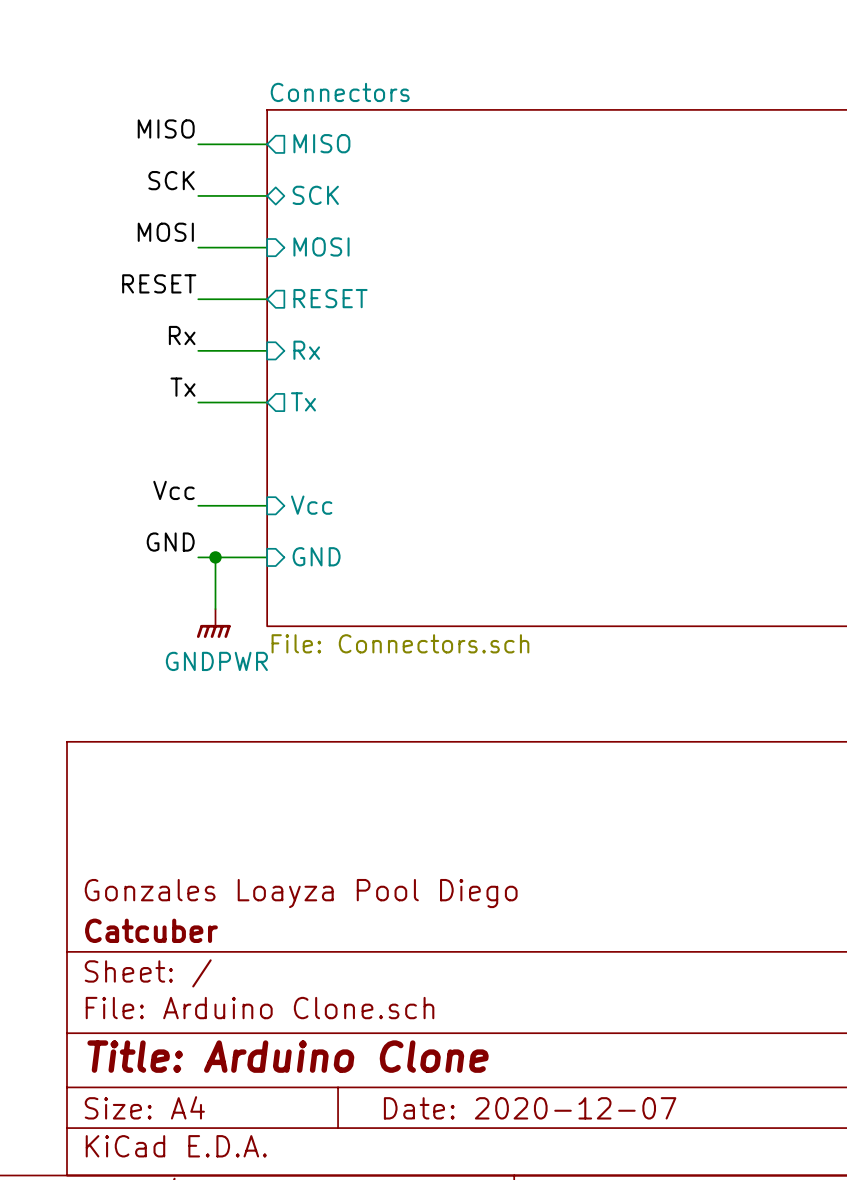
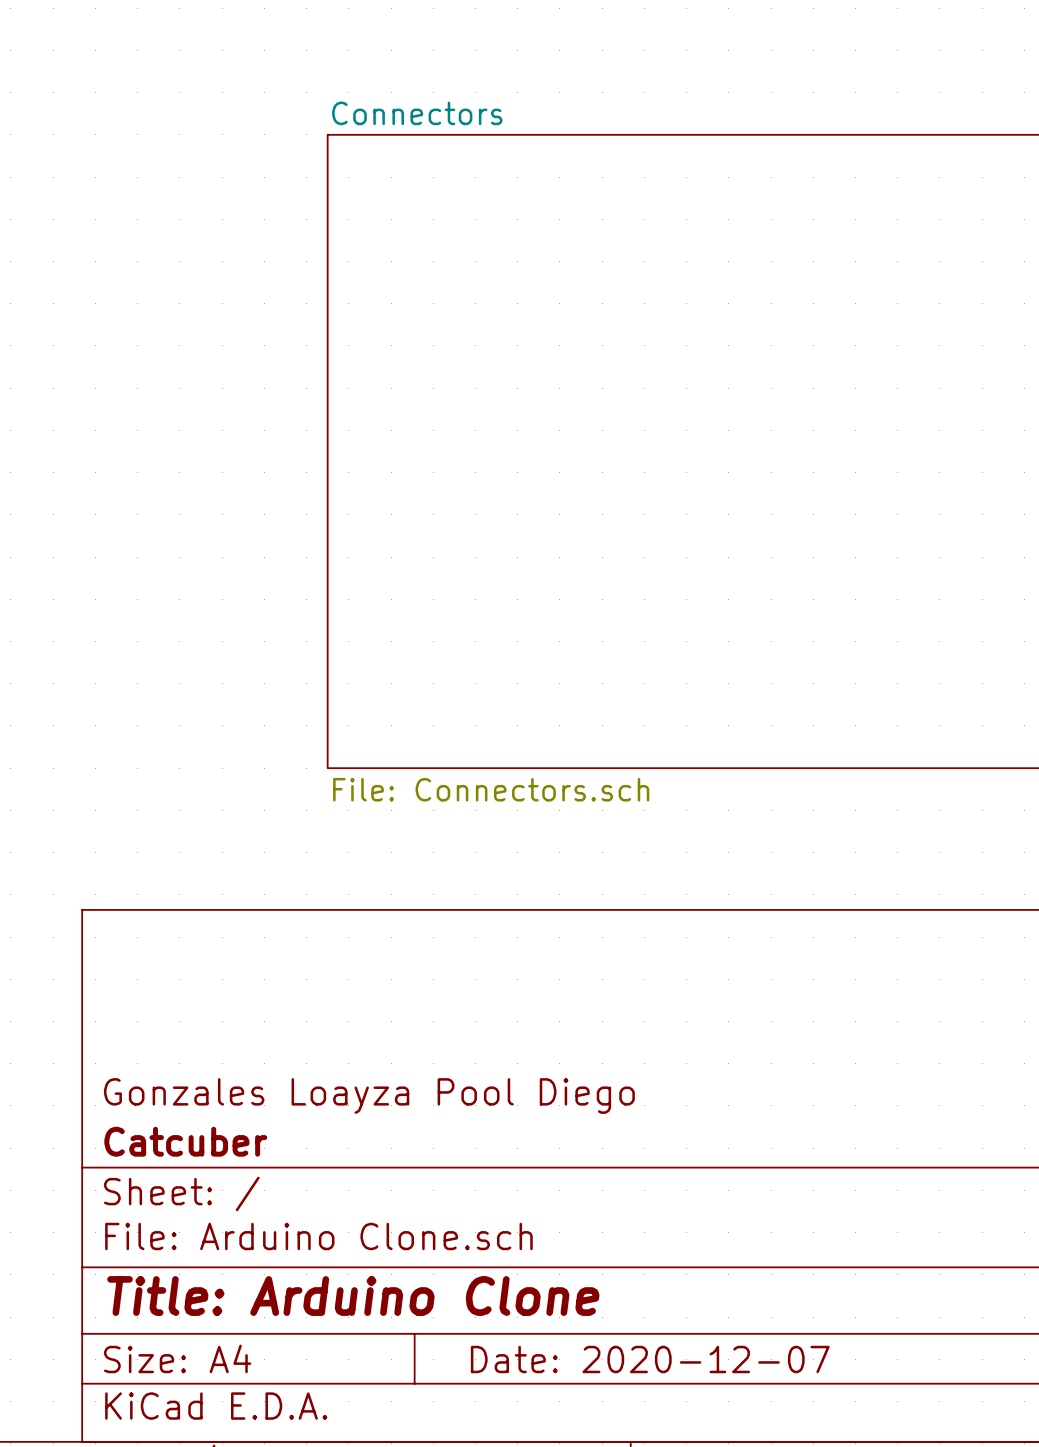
label: MISO (166, 128) -> none
sheet pin: MISO (321, 143) -> none
wire: (198, 144) (267, 144) -> none
label: SCK (171, 180) -> none
wire: (198, 195) (267, 195) -> none
sheet pin: SCK (315, 195) -> none
label: MOSI (165, 232) -> none
sheet pin: MOSI (321, 246) -> none
wire: (198, 247) (267, 247) -> none
label: RESET (159, 283) -> none
sheet pin: RESET (330, 298) -> none
wire: (198, 299) (267, 299) -> none
label: Rx (182, 335) -> none
wire: (198, 350) (267, 350) -> none
sheet pin: Rx (306, 350) -> none
label: Tx (183, 387) -> none
sheet pin: Tx (303, 401) -> none
wire: (198, 402) (267, 402) -> none
label: Vcc (173, 490) -> none
wire: (198, 505) (267, 505) -> none
sheet pin: Vcc (311, 505) -> none
label: GND (170, 542) -> none
sheet pin: GND (316, 556) -> none
wire: (198, 557) (267, 557) -> none
wire: (215, 557) (215, 609) -> none
junction: (215, 557) -> none
power symbol: GNDPWR (213, 623) -> none

